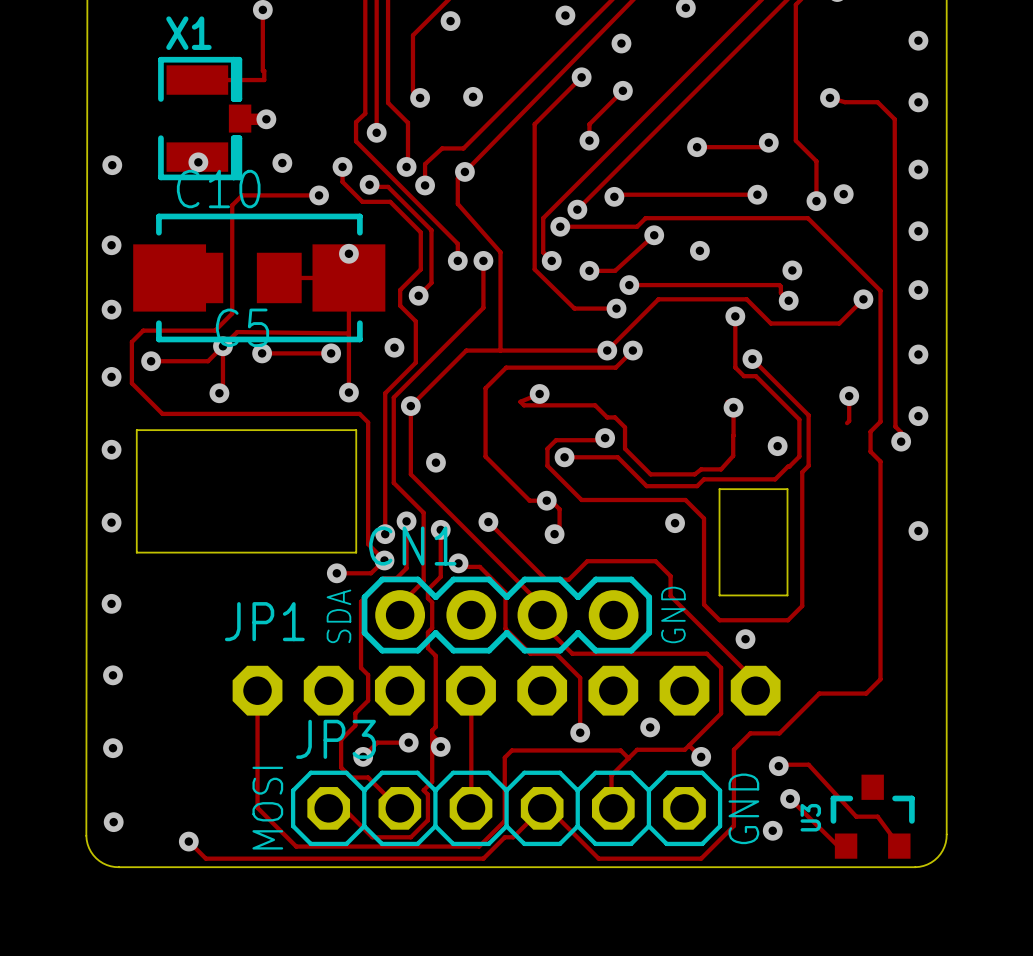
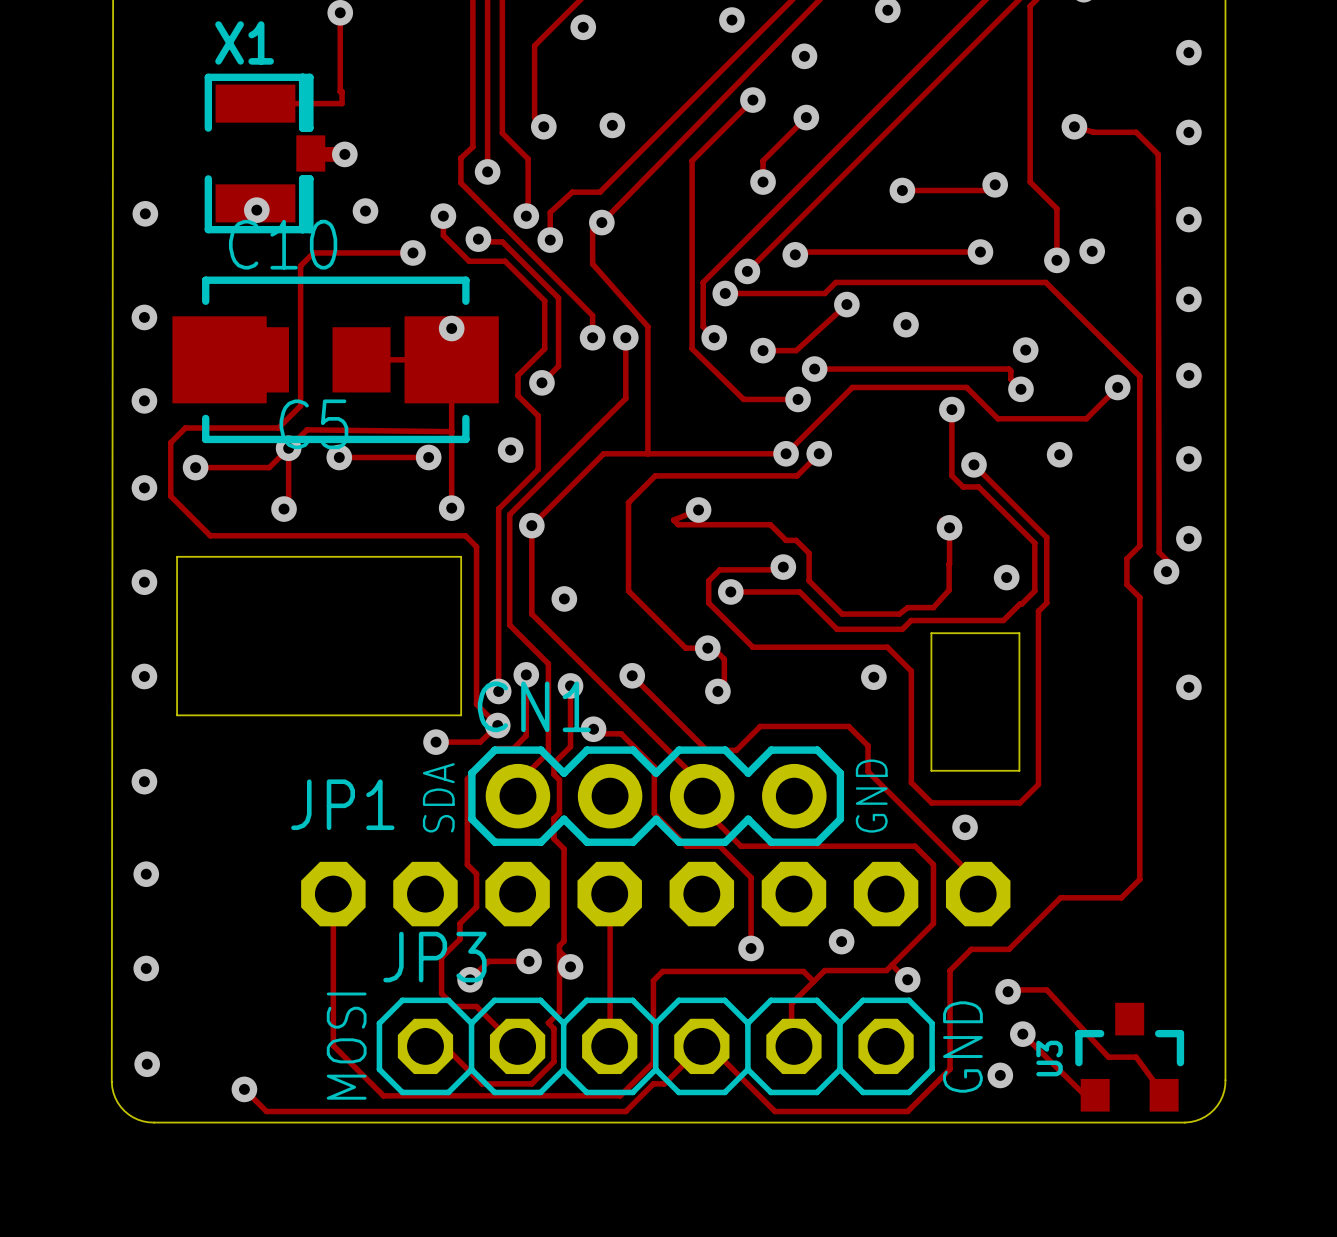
track: (849, 396) (849, 421) (847, 423) -> none
via position: (849, 396) -> (1059, 454)

